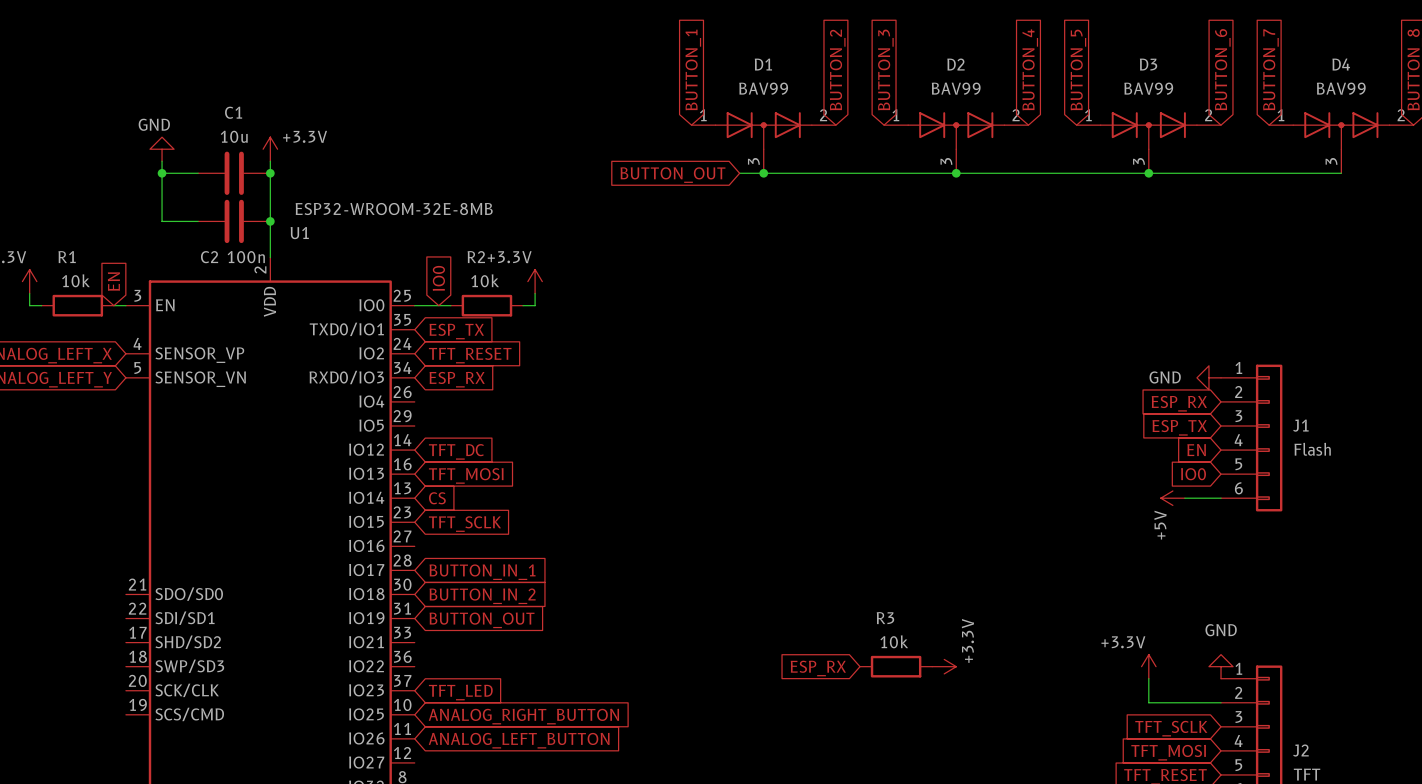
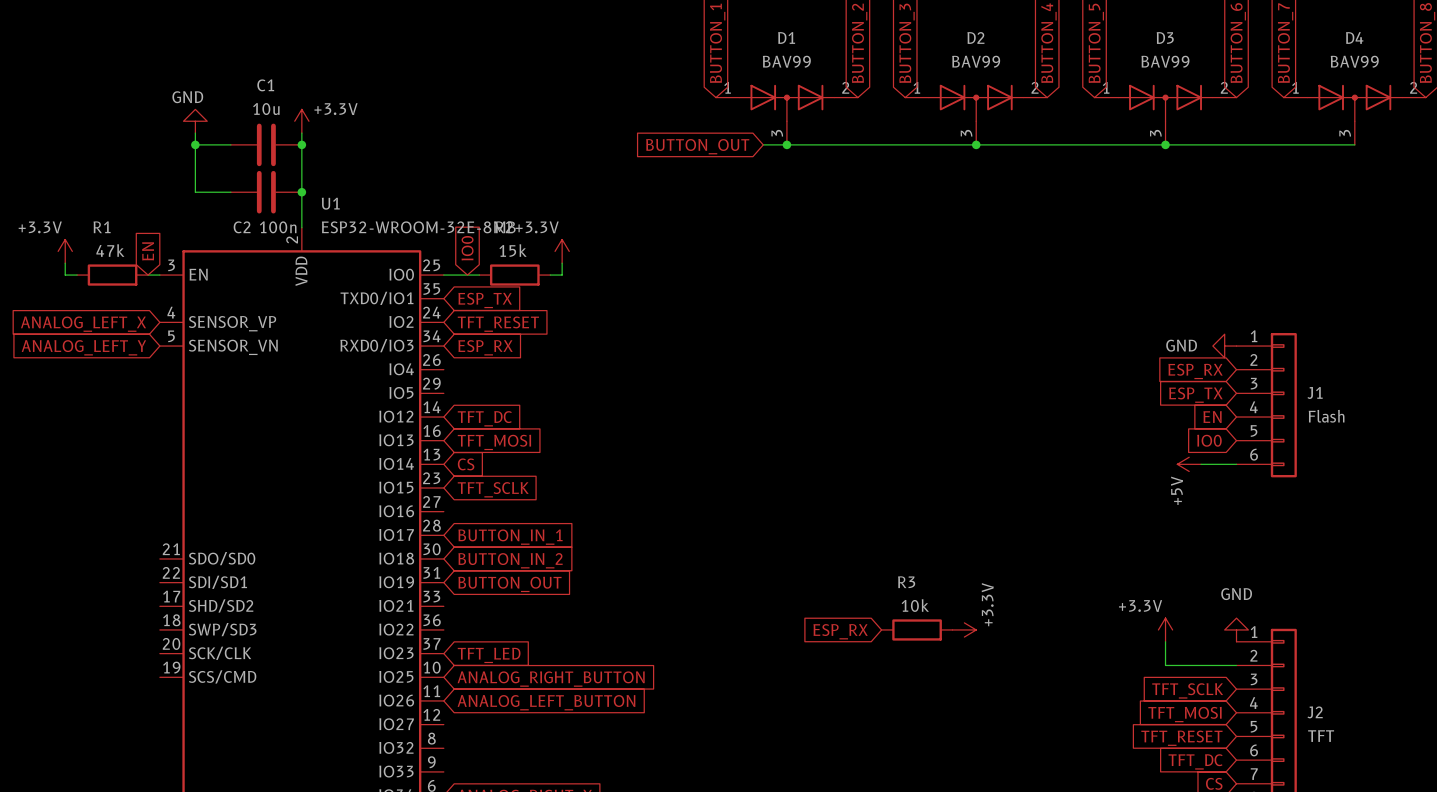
U1 value position: ESP32-WROOM-32E-8MB (394, 209) -> ESP32-WROOM-32E-8MB (418, 227)
R1 value: 10k (75, 280) -> 47k (110, 250)
R2 value: 10k (485, 280) -> 15k (513, 250)

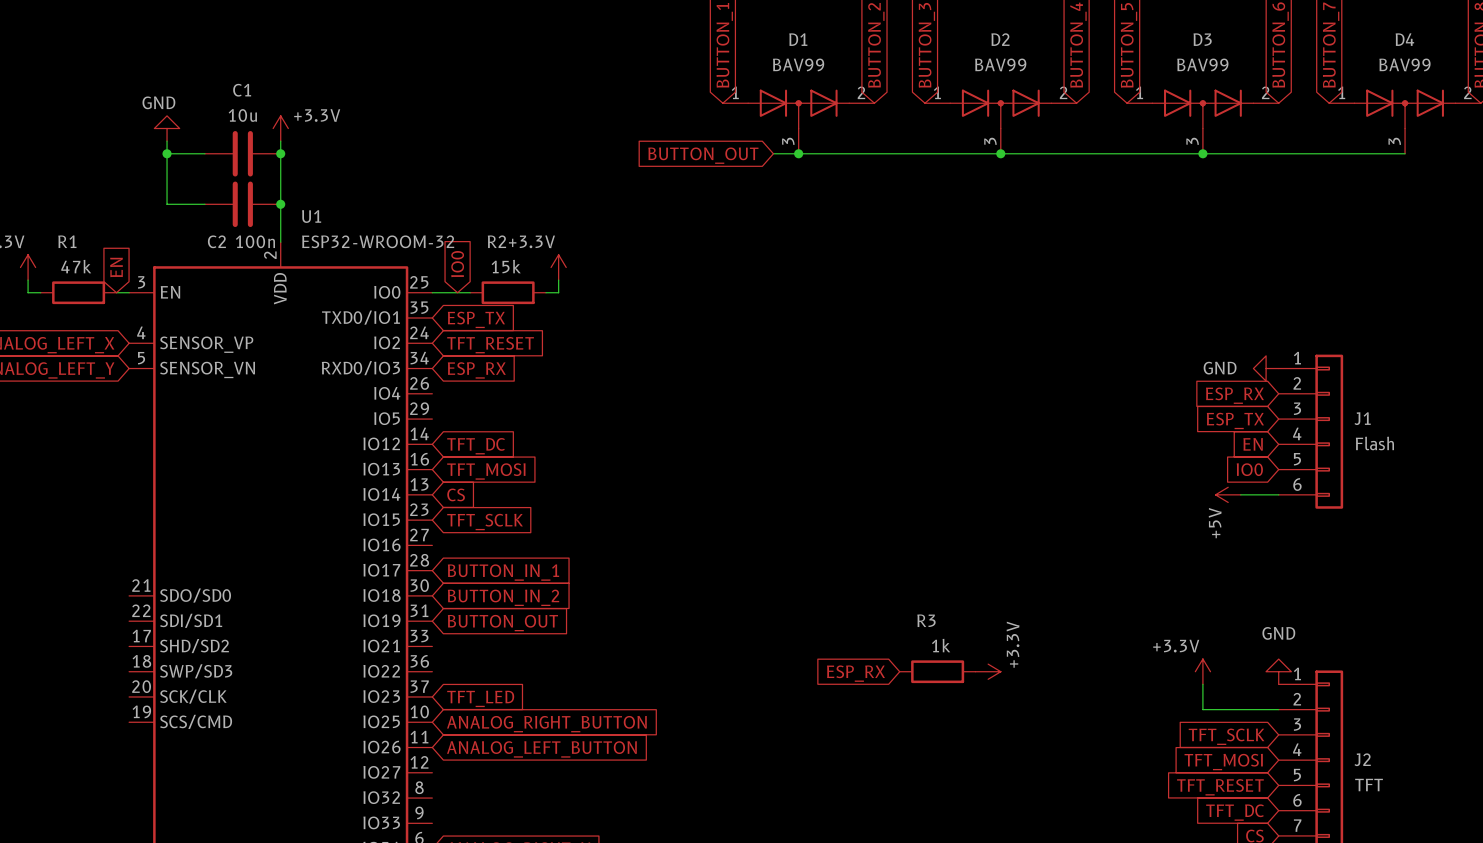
U1 value: ESP32-WROOM-32E-8MB (418, 227) -> ESP32-WROOM-32 (378, 241)
R3 value: 10k (915, 605) -> 1k (941, 645)

